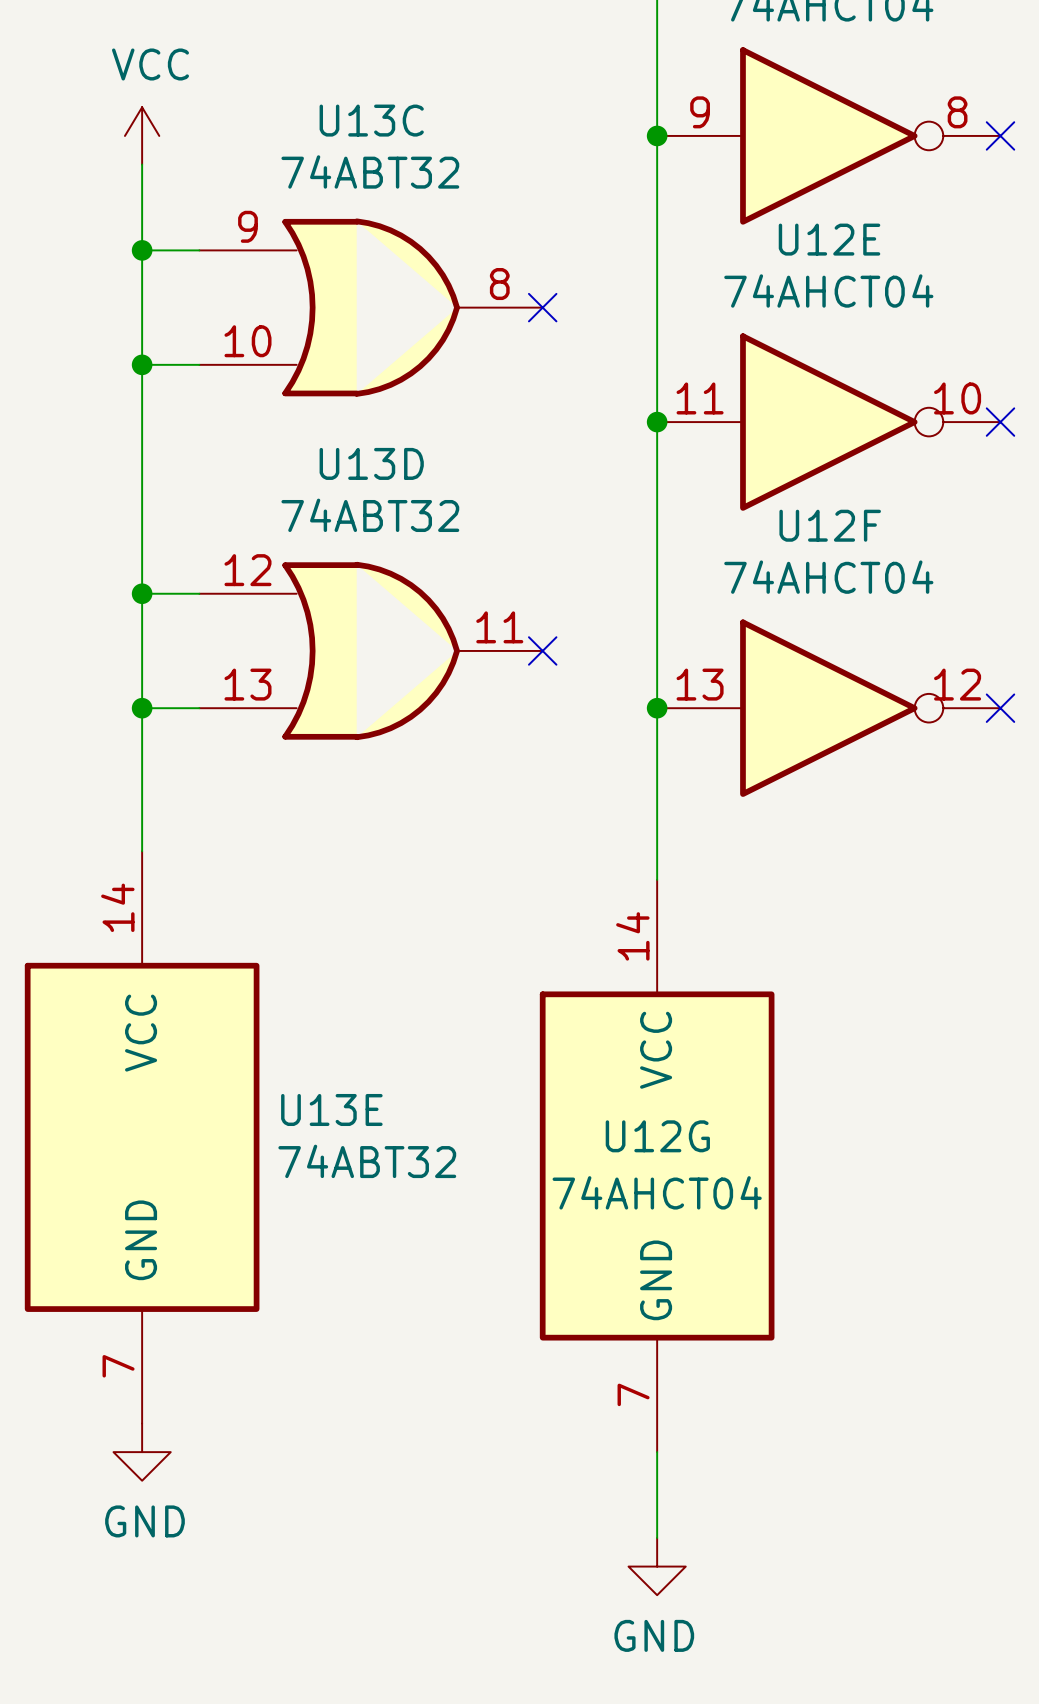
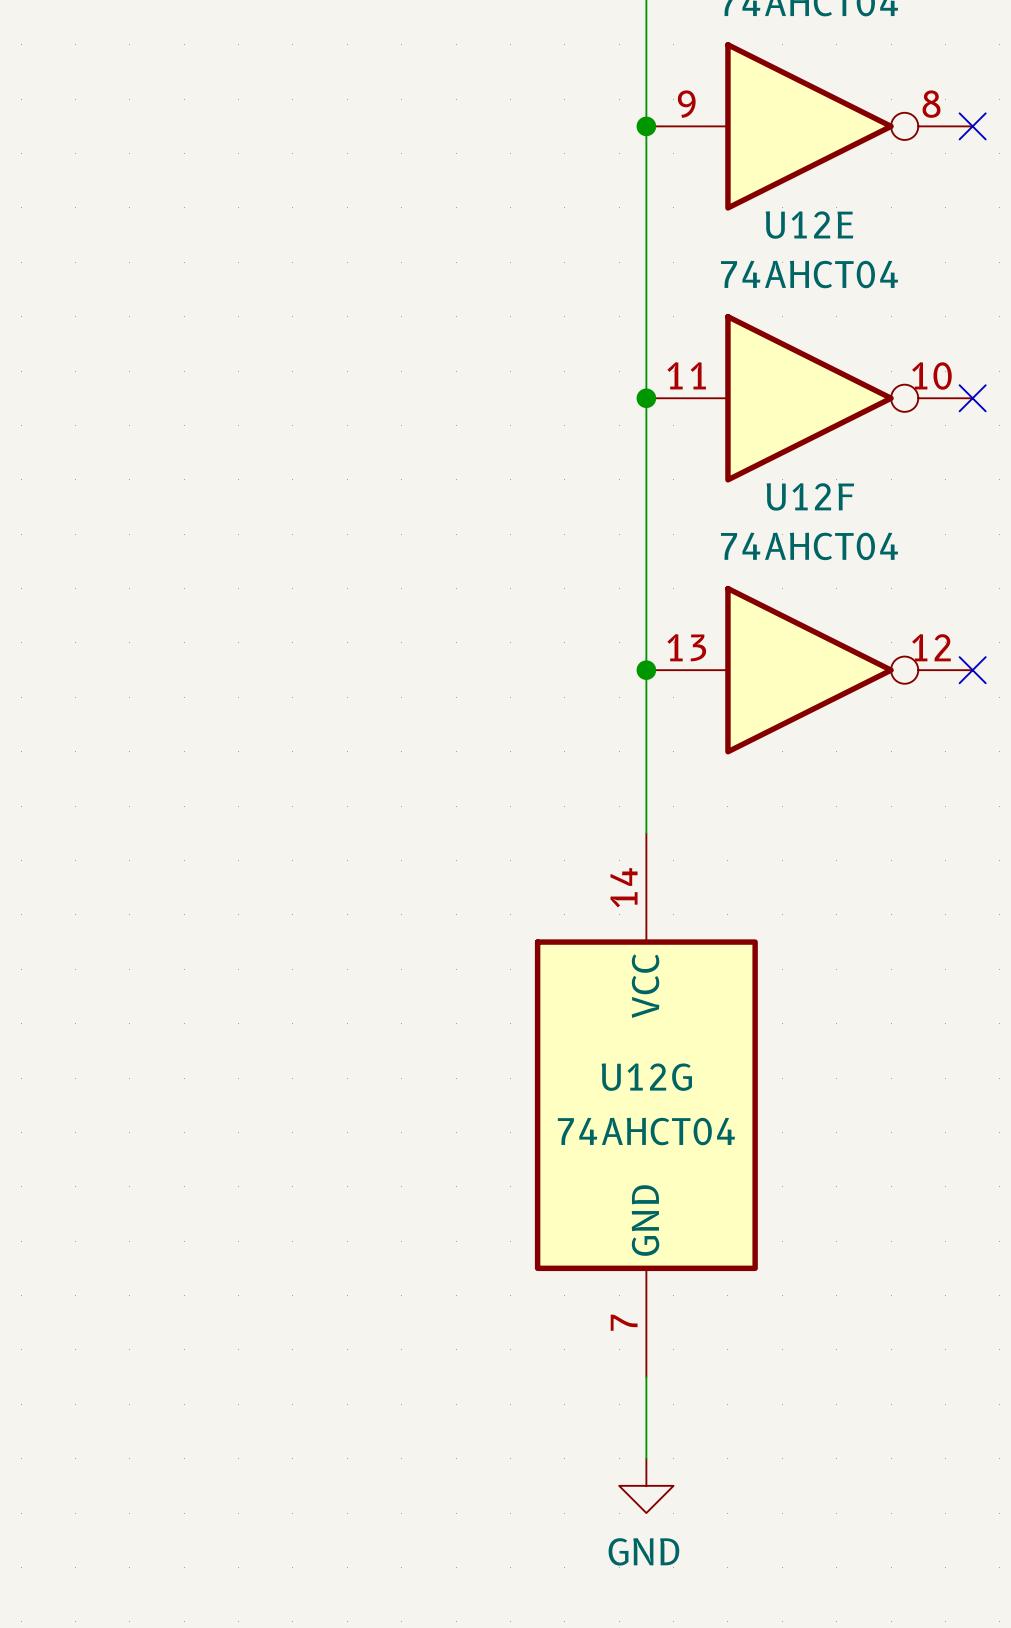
power symbol: VCC (142, 135) -> none
wire: (142, 164) (142, 851) -> none
wire: (142, 250) (199, 250) -> none
junction: (142, 250) -> none
U13C: 74ABT32 (371, 307) -> none
no-connect mark: (542, 307) -> none
wire: (142, 364) (199, 364) -> none
junction: (142, 364) -> none
wire: (142, 593) (199, 593) -> none
junction: (142, 593) -> none
U13D: 74ABT32 (371, 650) -> none
no-connect mark: (542, 650) -> none
wire: (142, 708) (199, 708) -> none
junction: (142, 708) -> none
U13E: 74ABT32 (142, 1137) -> none
power symbol: GND (142, 1452) -> none

